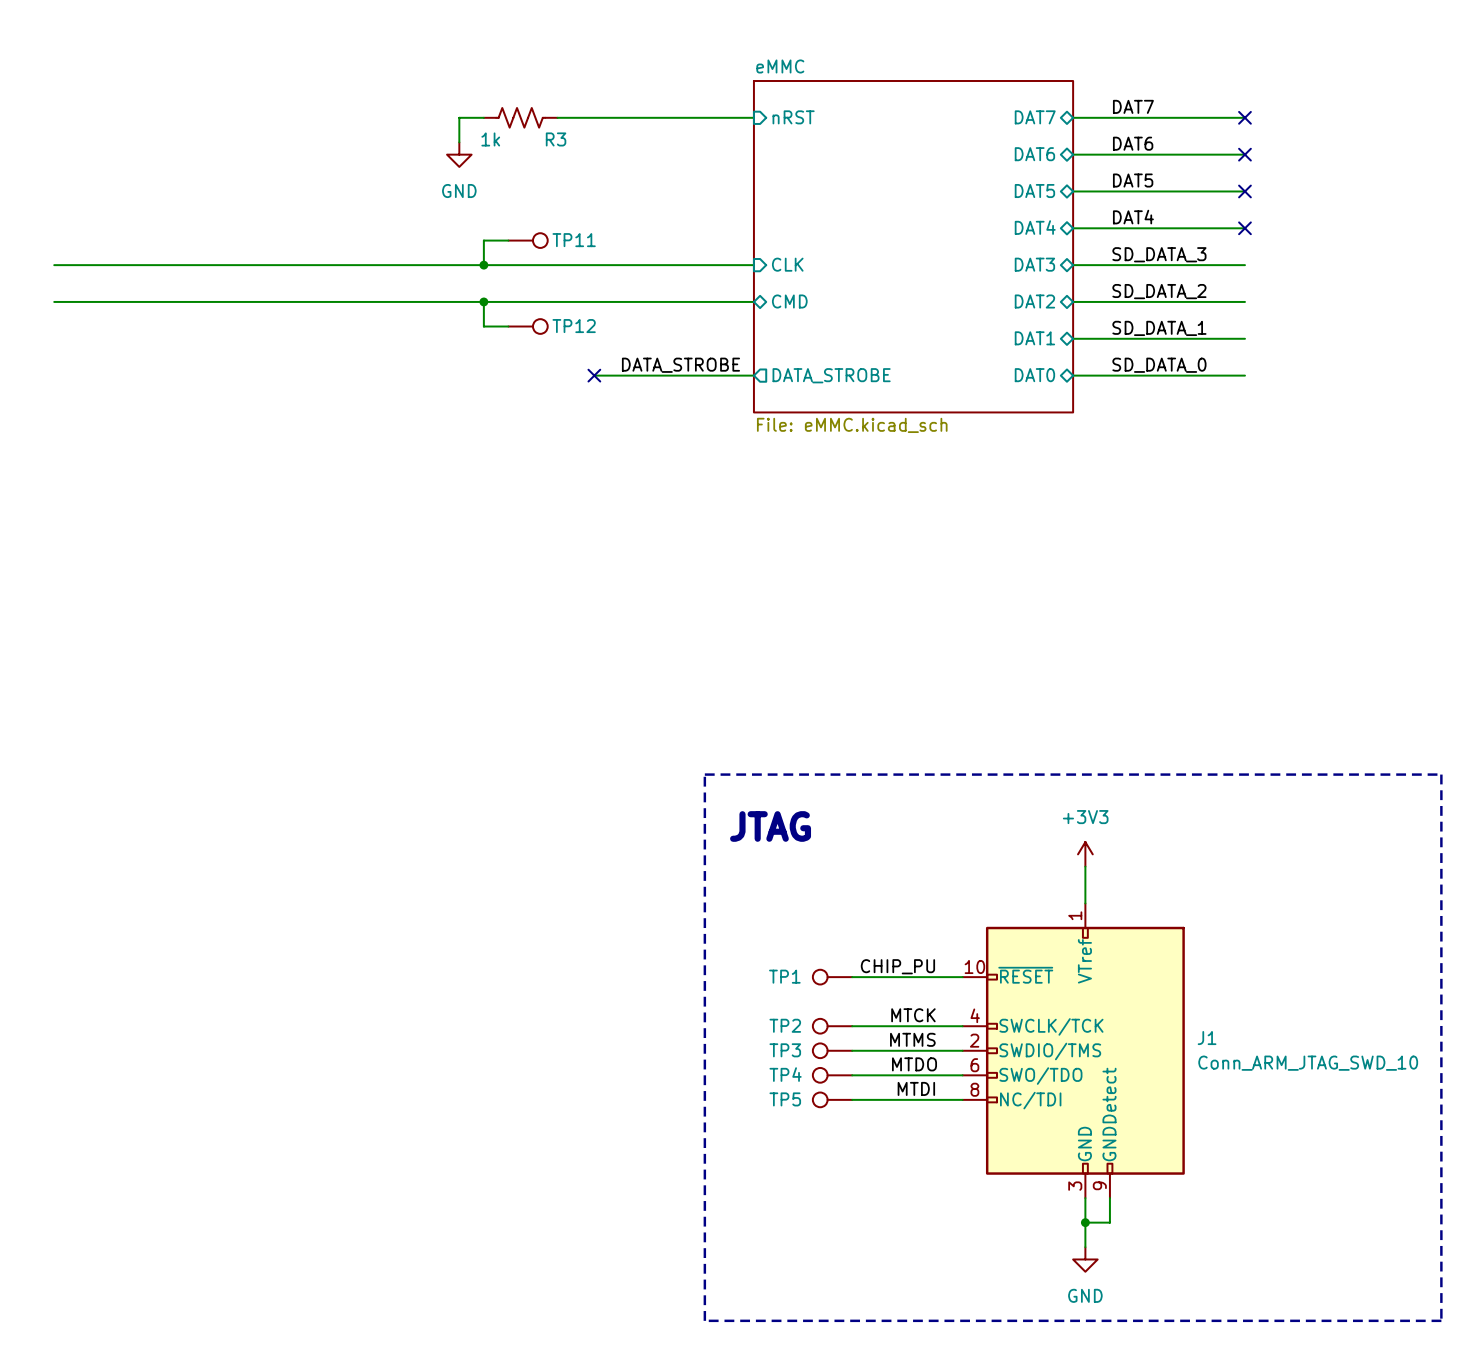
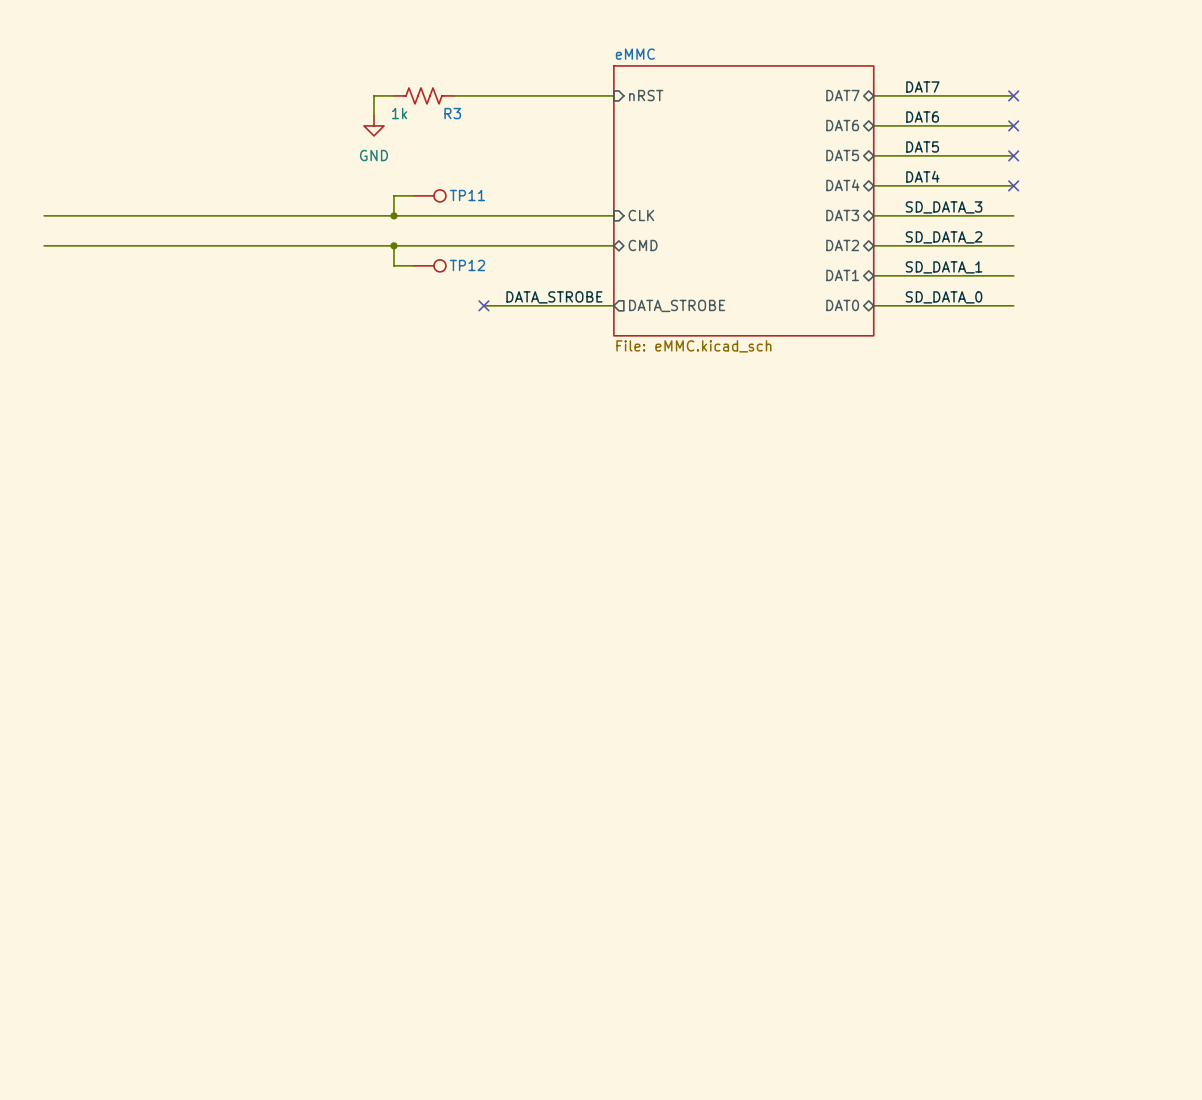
line: (704, 774) (1441, 774) (1441, 1320) (704, 1320) (704, 774) -> none
text: JTAG (770, 826) -> none
power symbol: +3V3 (1085, 854) -> none
wire: (1085, 866) (1085, 903) -> none
label: CHIP_PU (897, 966) -> none
TP1: (832, 977) -> none
wire: (852, 977) (962, 977) -> none
label: MTCK (913, 1015) -> none
TP2: (832, 1026) -> none
wire: (852, 1026) (962, 1026) -> none
label: MTMS (912, 1039) -> none
TP3: (832, 1050) -> none
wire: (852, 1050) (962, 1050) -> none
J1: Conn_ARM_JTAG_SWD_10 (1073, 1050) -> none
label: MTDO (914, 1064) -> none
TP4: (832, 1075) -> none
wire: (852, 1075) (962, 1075) -> none
label: MTDI (916, 1088) -> none
TP5: (832, 1099) -> none
wire: (852, 1099) (962, 1099) -> none
wire: (1085, 1198) (1085, 1247) -> none
wire: (1109, 1198) (1109, 1222) (1085, 1222) -> none
junction: (1085, 1222) -> none
power symbol: GND (1085, 1259) -> none

